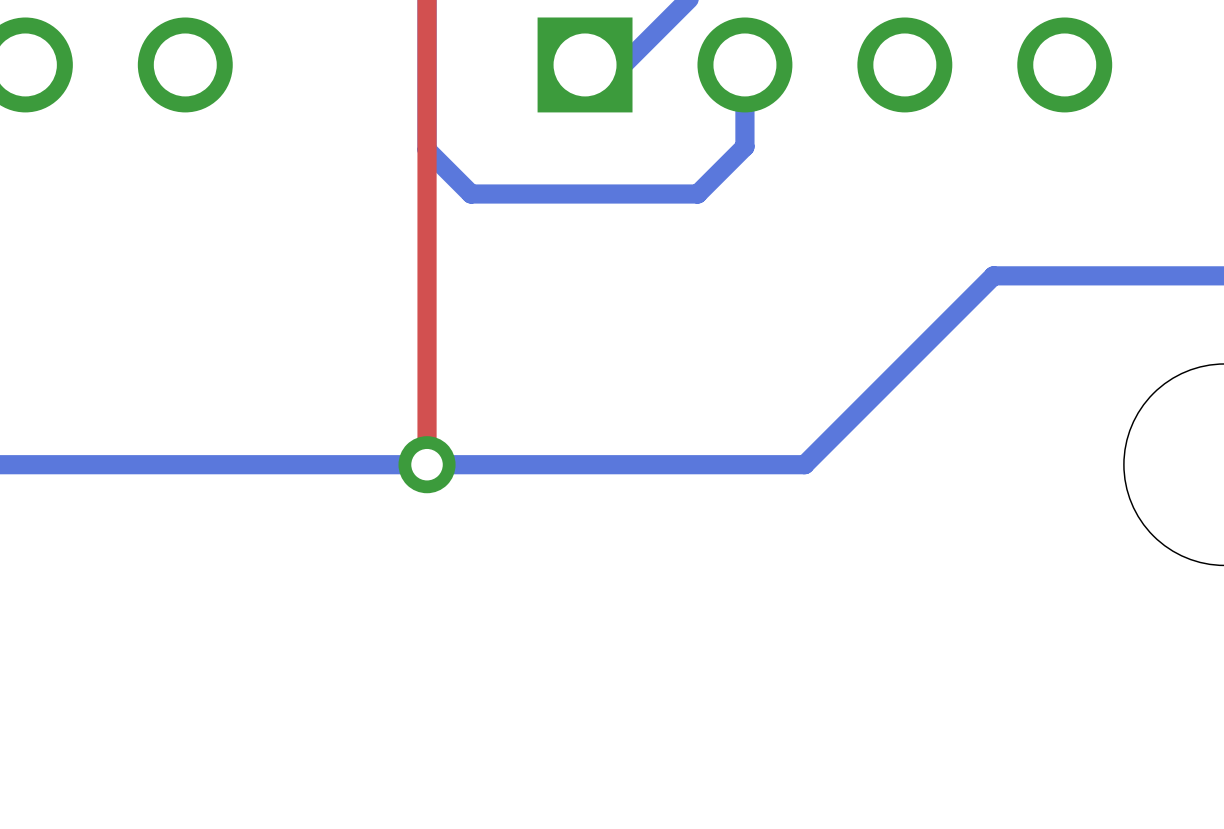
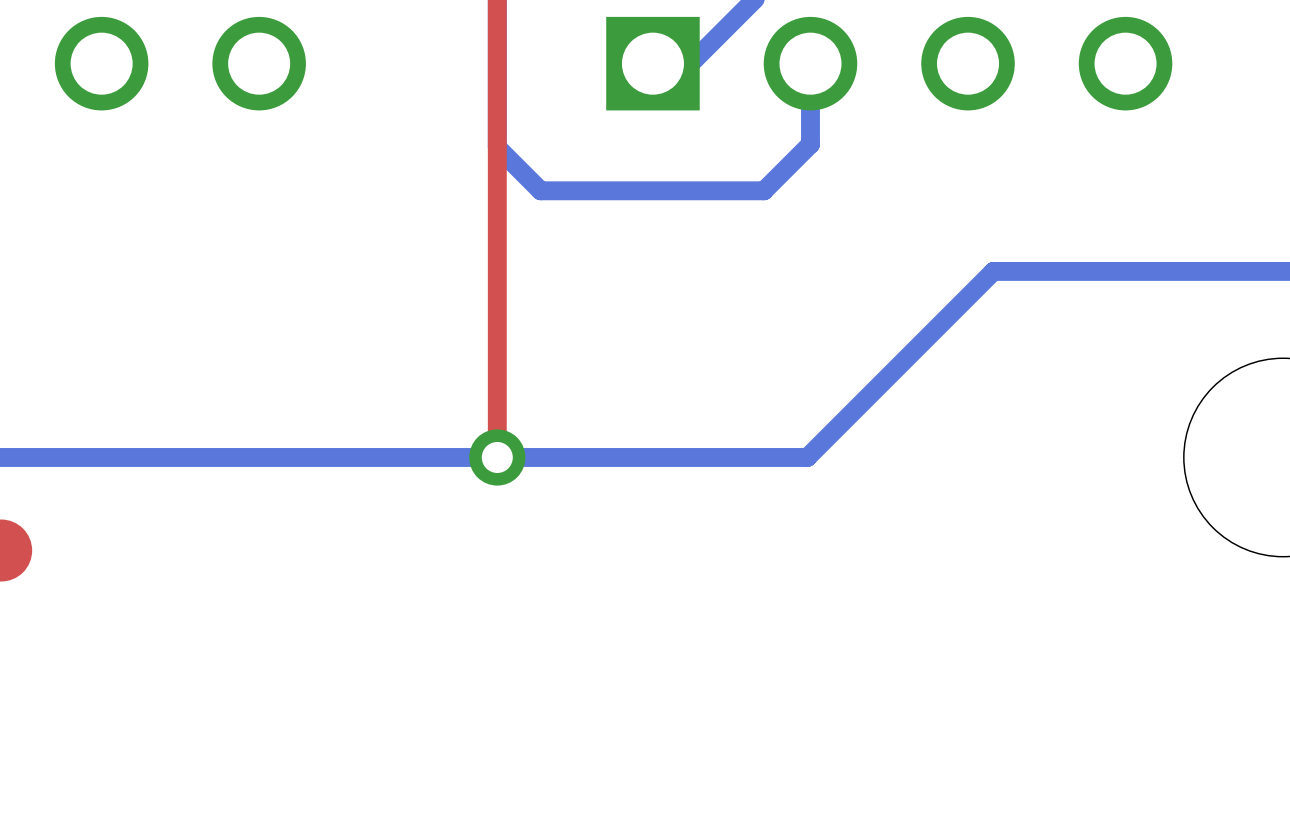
bottom track: (993, 275) (804, 464) (741, 464) -> (1055, 271) (993, 271) (807, 457)

